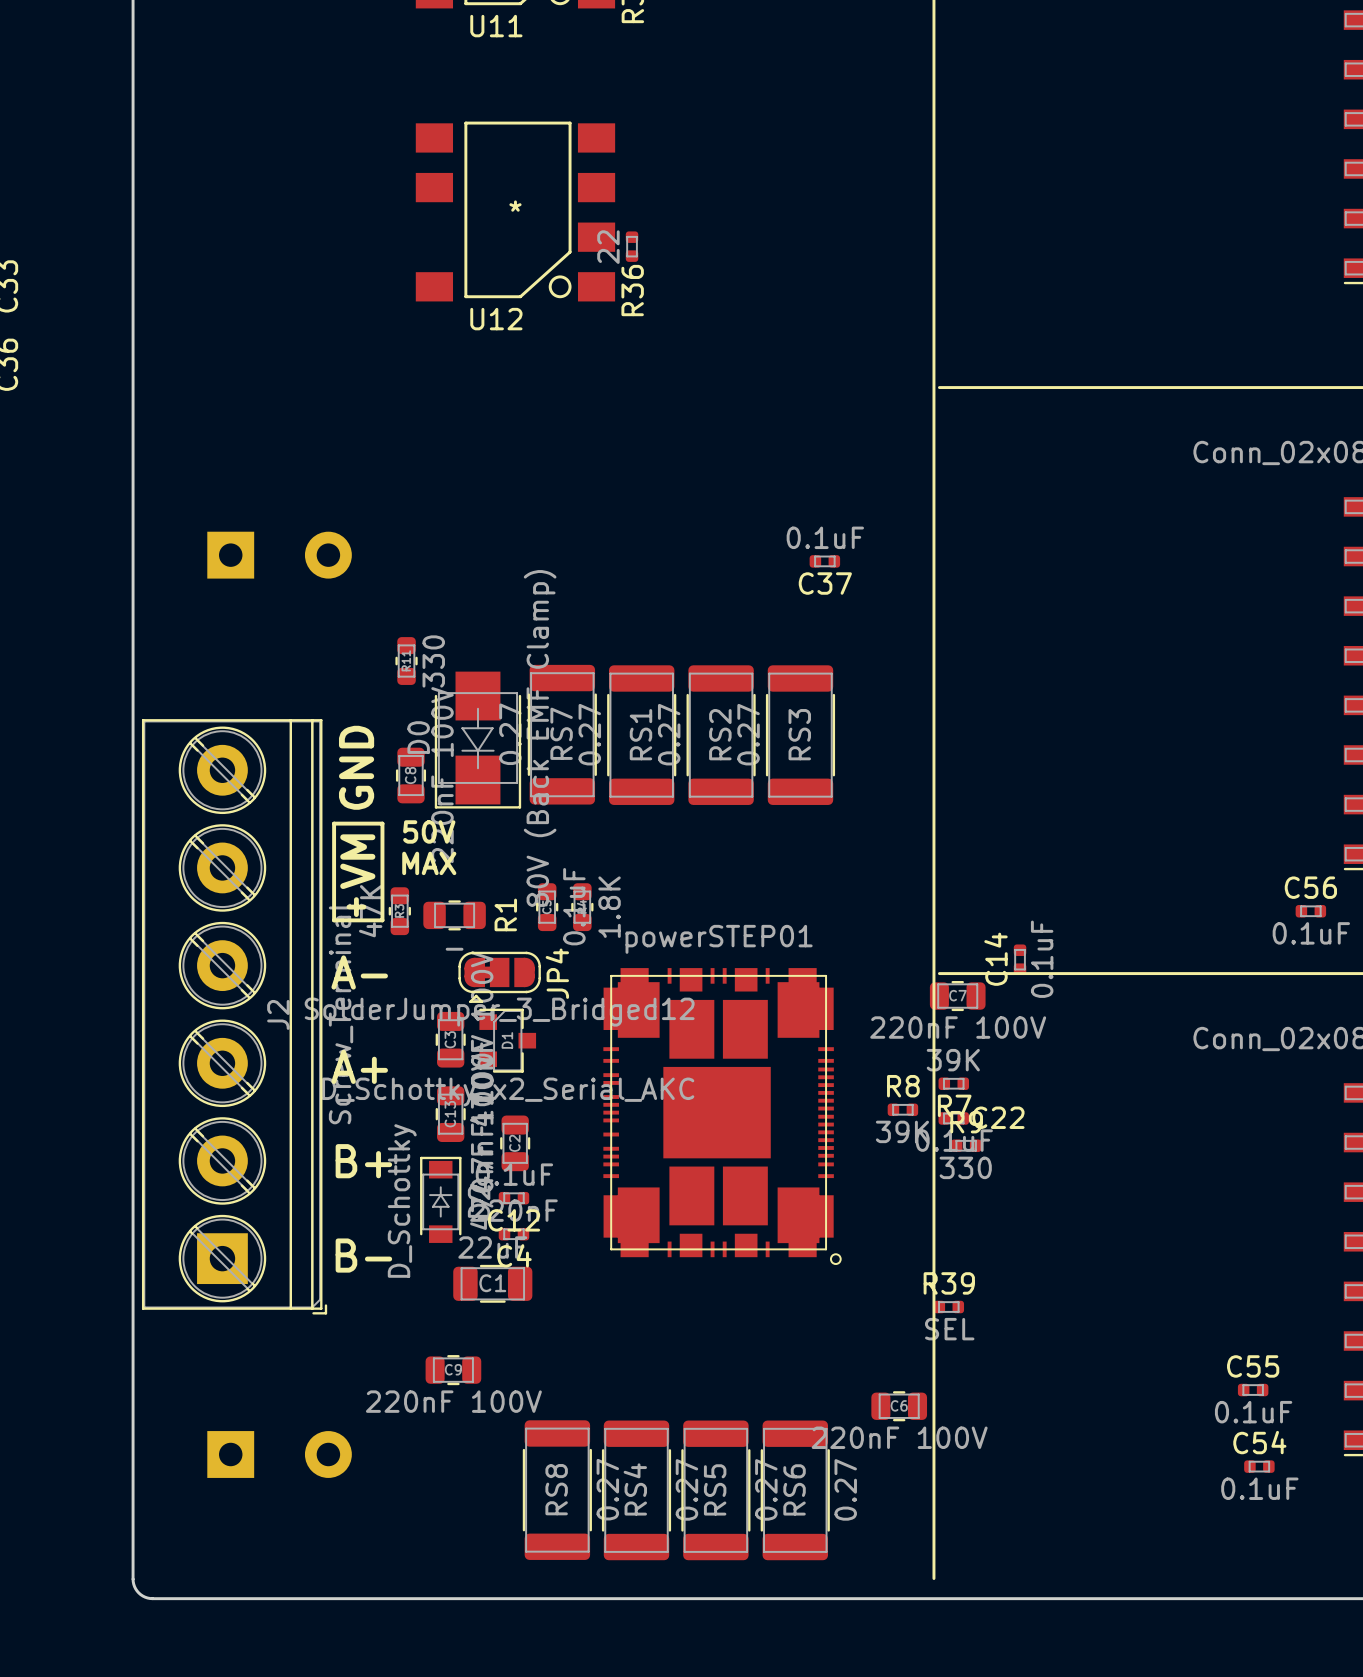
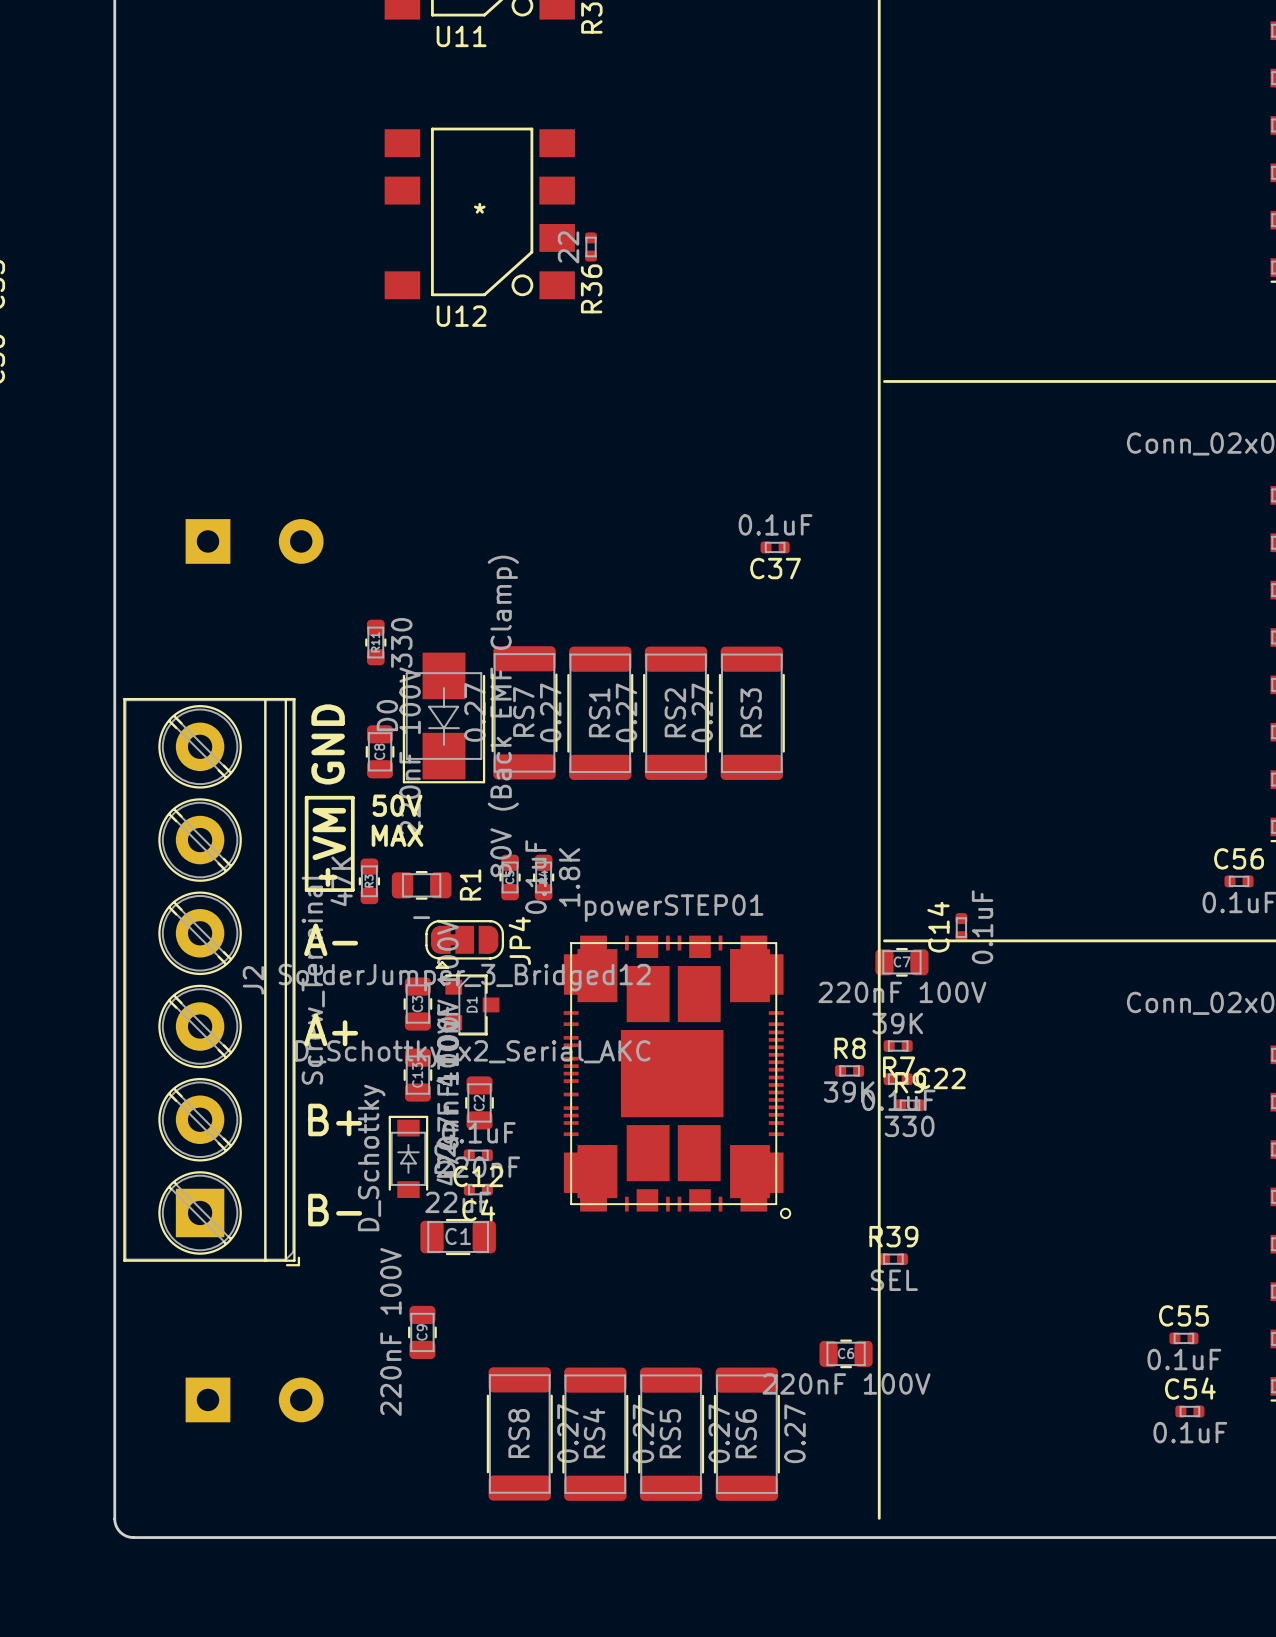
C9 rotation: 0° (453, 1370) -> 90° clockwise (422, 1332)

